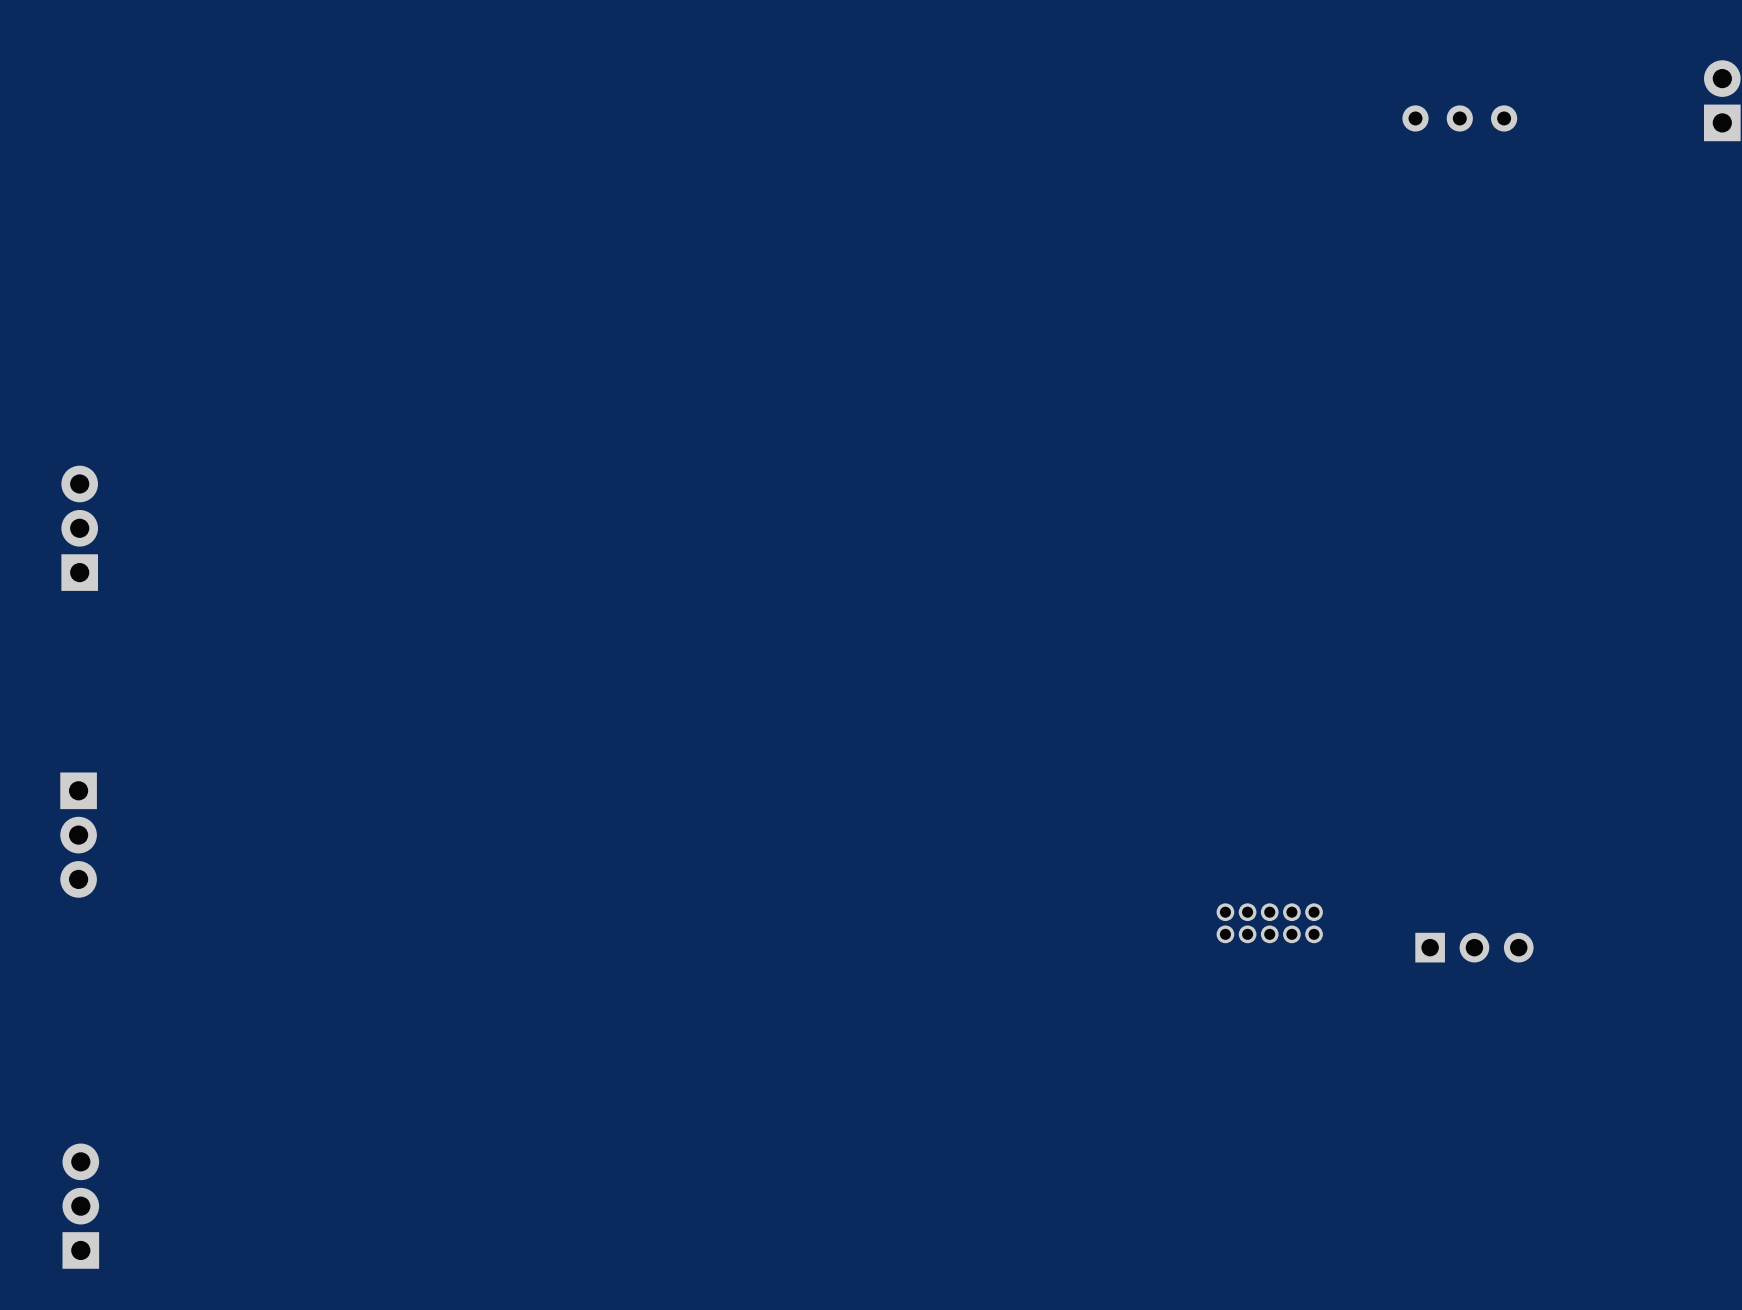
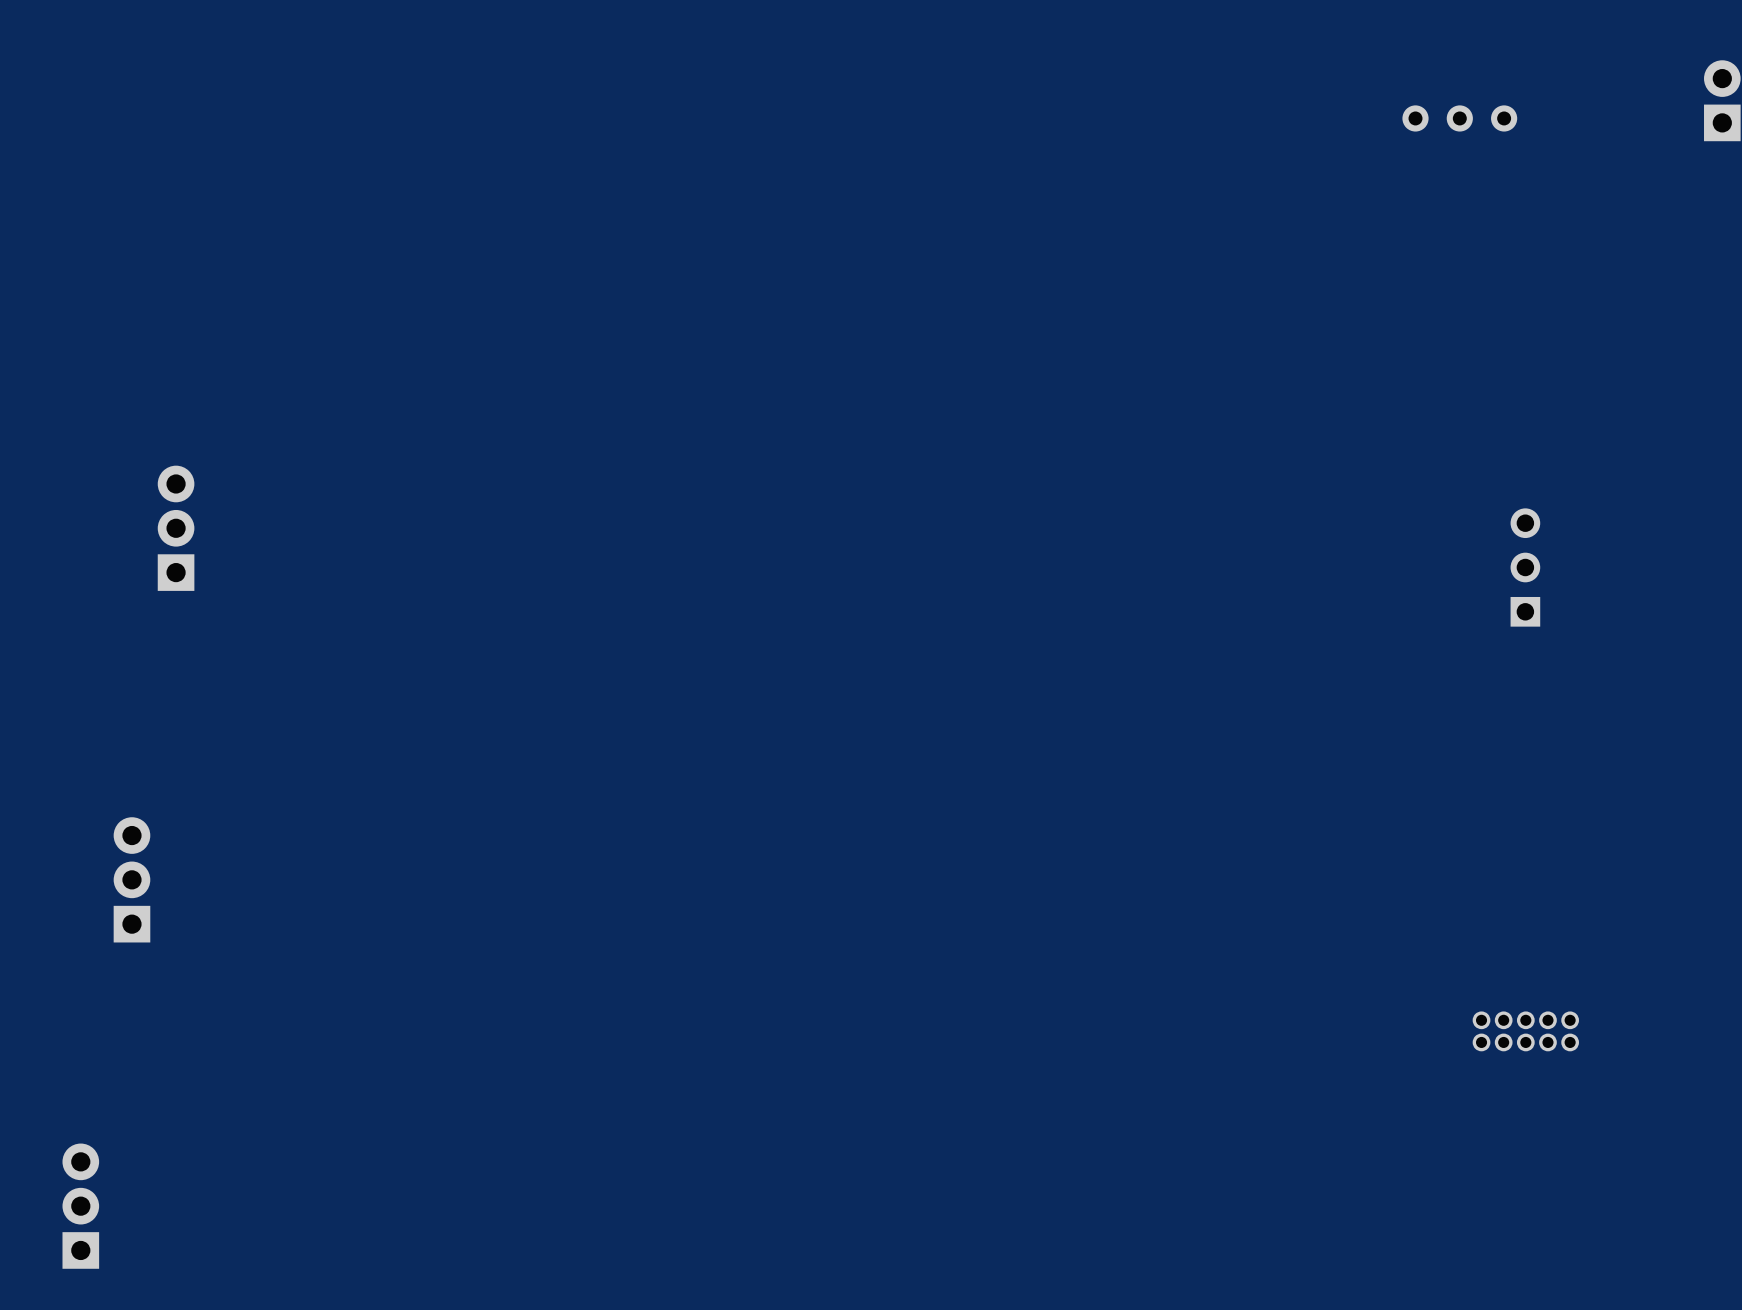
part position: (79, 528) -> (176, 528)
part rotation: 0° (78, 835) -> 180° (131, 879)
part position: (1269, 923) -> (1525, 1031)
part rotation: 0° (1474, 947) -> 90° counterclockwise (1525, 567)
part position: (1474, 947) -> (1525, 567)

